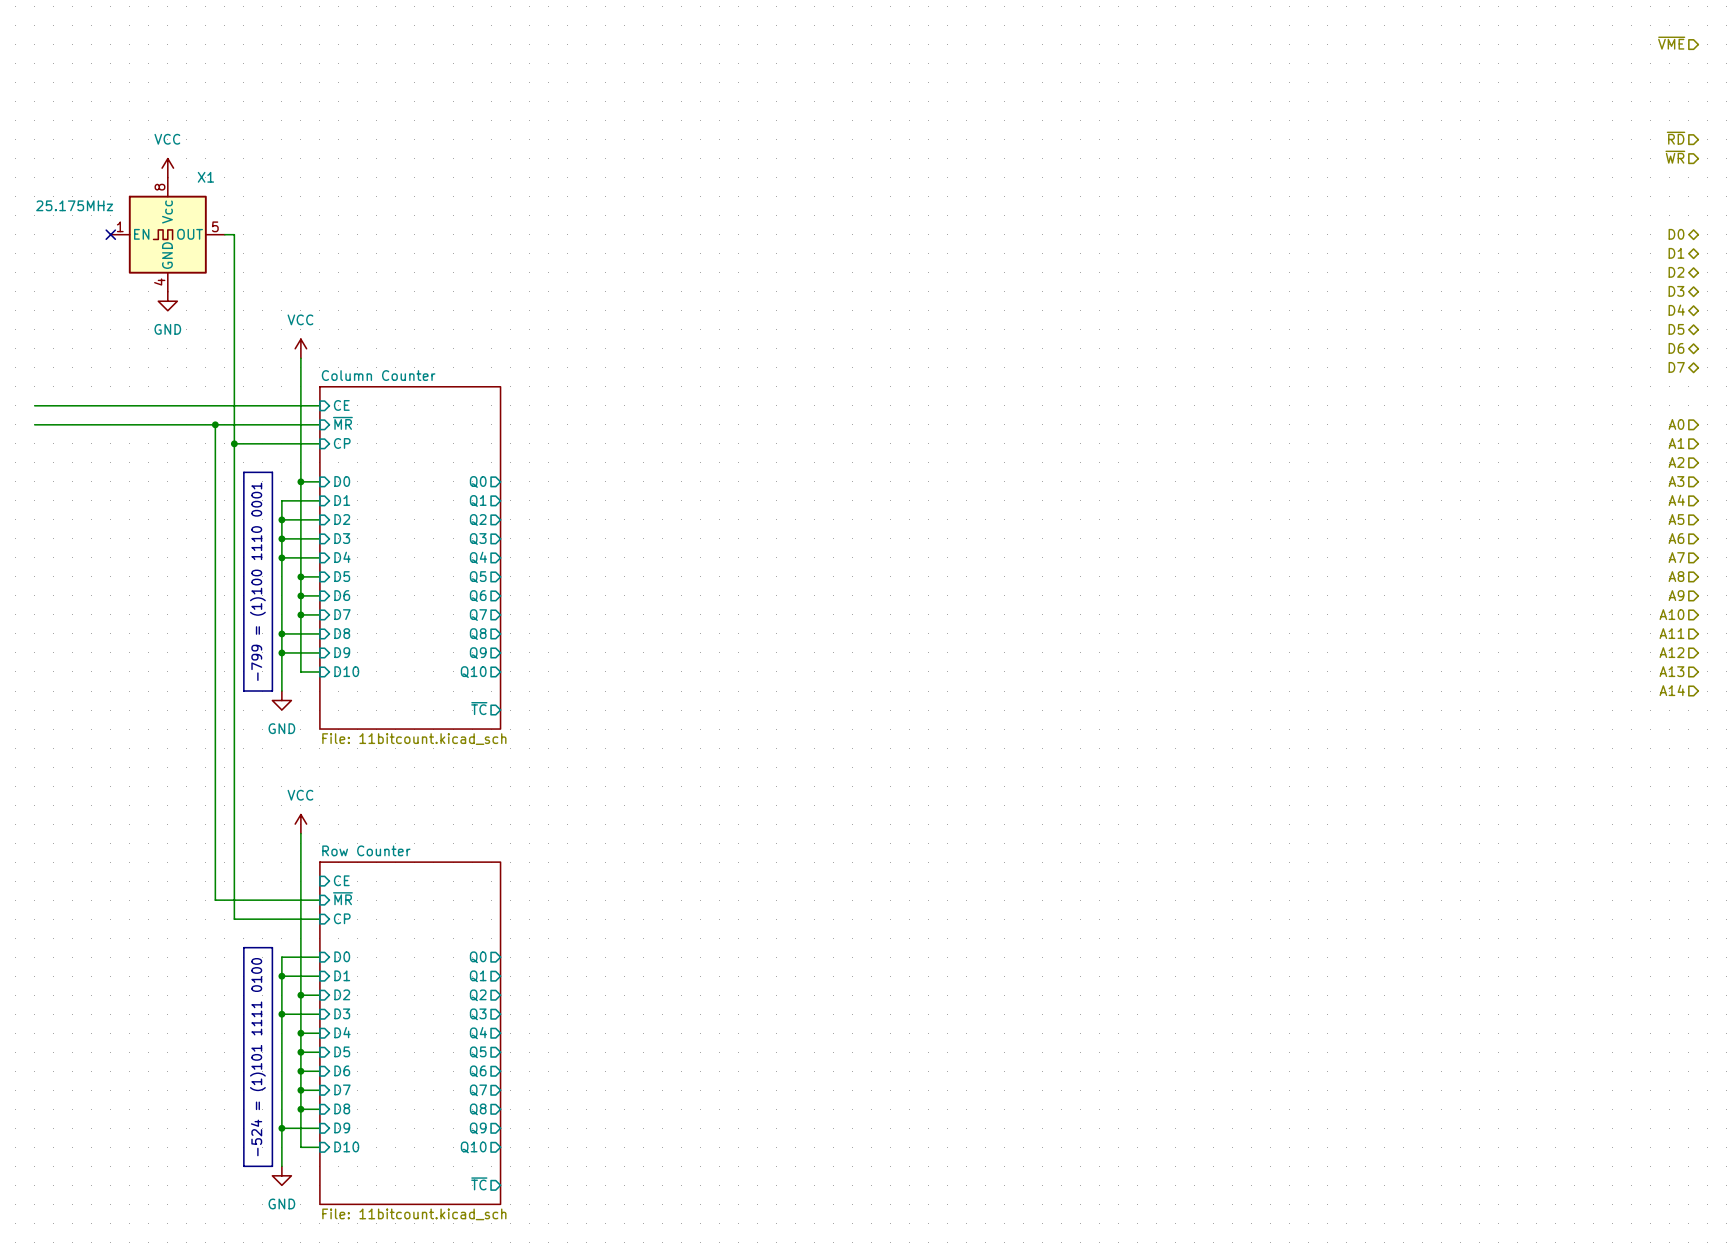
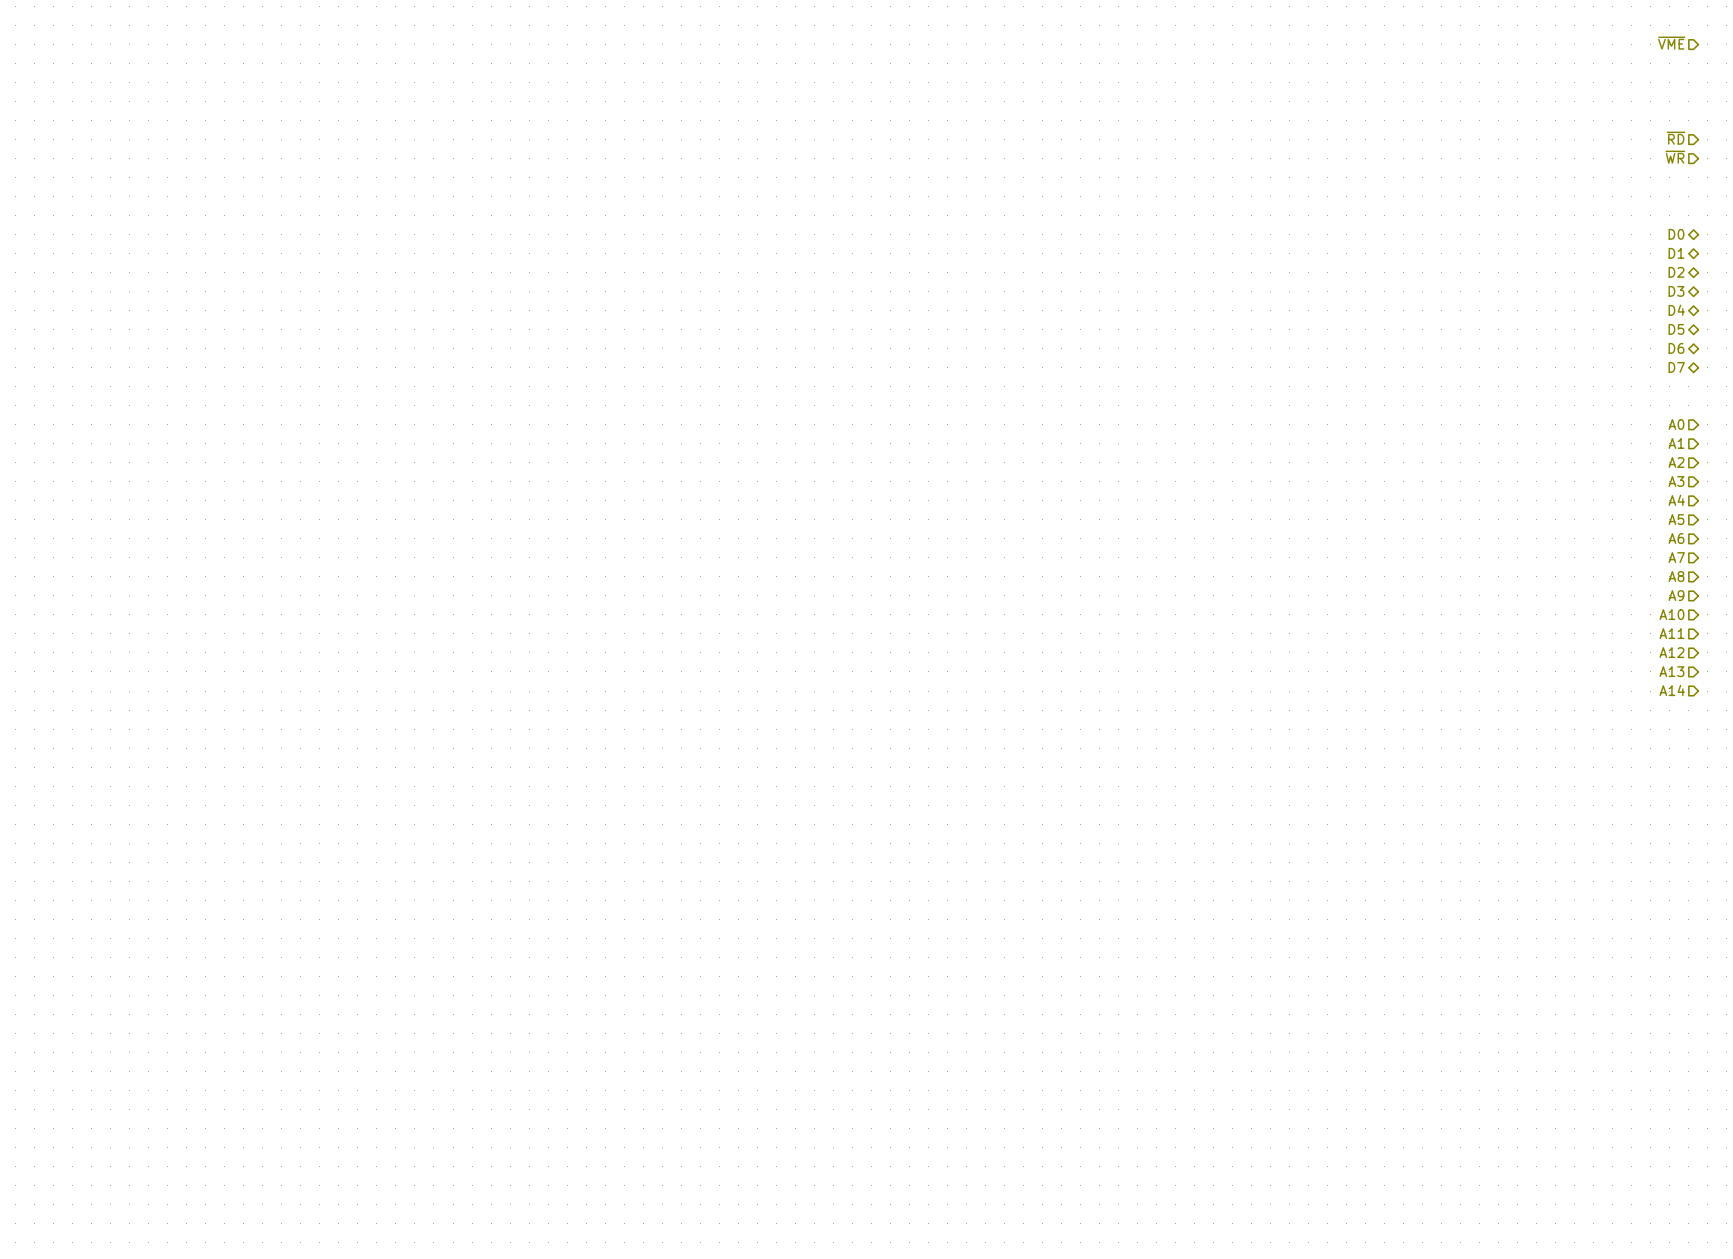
power symbol: VCC (167, 168) -> none
no-connect mark: (110, 234) -> none
X1: 25.175MHz (167, 234) -> none
wire: (224, 234) (234, 234) (234, 919) (319, 919) -> none
power symbol: GND (167, 301) -> none
power symbol: VCC (300, 348) -> none
wire: (300, 358) (300, 671) (319, 671) -> none
wire: (34, 405) (319, 405) -> none
sheet pin: CE (341, 405) -> none
sheet pin: ~{MR} (342, 423) -> none
wire: (34, 424) (319, 424) -> none
wire: (215, 424) (215, 900) (319, 900) -> none
junction: (215, 424) -> none
wire: (234, 443) (319, 443) -> none
junction: (234, 443) -> none
sheet pin: CP (342, 443) -> none
line: (243, 472) (243, 691) (272, 691) (272, 472) (243, 472) -> none
wire: (300, 481) (319, 481) -> none
junction: (300, 481) -> none
sheet pin: D0 (342, 481) -> none
sheet pin: Q0 (478, 481) -> none
wire: (319, 500) (281, 500) (281, 691) -> none
sheet pin: D1 (342, 500) -> none
sheet pin: Q1 (478, 500) -> none
wire: (281, 519) (319, 519) -> none
junction: (281, 519) -> none
sheet pin: D2 (342, 519) -> none
sheet pin: Q2 (478, 519) -> none
wire: (281, 538) (319, 538) -> none
junction: (281, 538) -> none
sheet pin: D3 (342, 538) -> none
sheet pin: Q3 (478, 538) -> none
wire: (281, 557) (319, 557) -> none
junction: (281, 557) -> none
sheet pin: D4 (342, 557) -> none
sheet Column Counter: File: 11bitcount.kicad_sch (410, 557) -> none
sheet pin: Q4 (478, 557) -> none
wire: (300, 576) (319, 576) -> none
junction: (300, 576) -> none
sheet pin: D5 (342, 576) -> none
sheet pin: Q5 (478, 577) -> none
text: -799 = (1)100 1110 0001 (257, 581) -> none
wire: (300, 595) (319, 595) -> none
junction: (300, 595) -> none
sheet pin: D6 (342, 595) -> none
sheet pin: Q6 (478, 596) -> none
wire: (300, 614) (319, 614) -> none
junction: (300, 614) -> none
sheet pin: D7 (342, 614) -> none
sheet pin: Q7 (478, 615) -> none
wire: (281, 633) (319, 633) -> none
junction: (281, 633) -> none
sheet pin: D8 (342, 633) -> none
sheet pin: Q8 (478, 634) -> none
wire: (281, 652) (319, 652) -> none
junction: (281, 652) -> none
sheet pin: D9 (342, 652) -> none
sheet pin: Q9 (478, 653) -> none
sheet pin: D10 (346, 671) -> none
sheet pin: Q10 (473, 672) -> none
power symbol: GND (281, 700) -> none
sheet pin: ~{TC} (479, 708) -> none
power symbol: VCC (300, 824) -> none
wire: (300, 833) (300, 1147) (319, 1147) -> none
sheet pin: CE (341, 880) -> none
sheet pin: ~{MR} (342, 898) -> none
sheet pin: CP (342, 918) -> none
line: (243, 947) (272, 947) (272, 1166) (243, 1166) (243, 947) -> none
sheet pin: D0 (342, 956) -> none
wire: (319, 957) (281, 957) (281, 1166) -> none
sheet pin: Q0 (478, 957) -> none
sheet pin: D1 (342, 975) -> none
wire: (281, 976) (319, 976) -> none
junction: (281, 976) -> none
sheet pin: Q1 (478, 976) -> none
sheet pin: D2 (342, 994) -> none
wire: (300, 995) (319, 995) -> none
junction: (300, 995) -> none
sheet pin: Q2 (478, 995) -> none
sheet pin: D3 (342, 1013) -> none
wire: (281, 1014) (319, 1014) -> none
junction: (281, 1014) -> none
sheet pin: Q3 (478, 1014) -> none
sheet pin: D4 (342, 1032) -> none
wire: (300, 1033) (319, 1033) -> none
junction: (300, 1033) -> none
sheet Row Counter: File: 11bitcount.kicad_sch (410, 1033) -> none
sheet pin: Q4 (478, 1033) -> none
sheet pin: D5 (342, 1051) -> none
wire: (300, 1052) (319, 1052) -> none
junction: (300, 1052) -> none
sheet pin: Q5 (478, 1052) -> none
text: -524 = (1)101 1111 0100 (257, 1057) -> none
sheet pin: D6 (342, 1070) -> none
wire: (300, 1071) (319, 1071) -> none
junction: (300, 1071) -> none
sheet pin: Q6 (478, 1071) -> none
sheet pin: D7 (342, 1089) -> none
wire: (300, 1090) (319, 1090) -> none
junction: (300, 1090) -> none
sheet pin: Q7 (478, 1090) -> none
sheet pin: D8 (342, 1108) -> none
wire: (300, 1109) (319, 1109) -> none
junction: (300, 1109) -> none
sheet pin: Q8 (478, 1109) -> none
sheet pin: D9 (342, 1127) -> none
wire: (281, 1128) (319, 1128) -> none
junction: (281, 1128) -> none
sheet pin: Q9 (478, 1128) -> none
sheet pin: D10 (346, 1146) -> none
sheet pin: Q10 (473, 1147) -> none
power symbol: GND (281, 1175) -> none
sheet pin: ~{TC} (479, 1183) -> none

